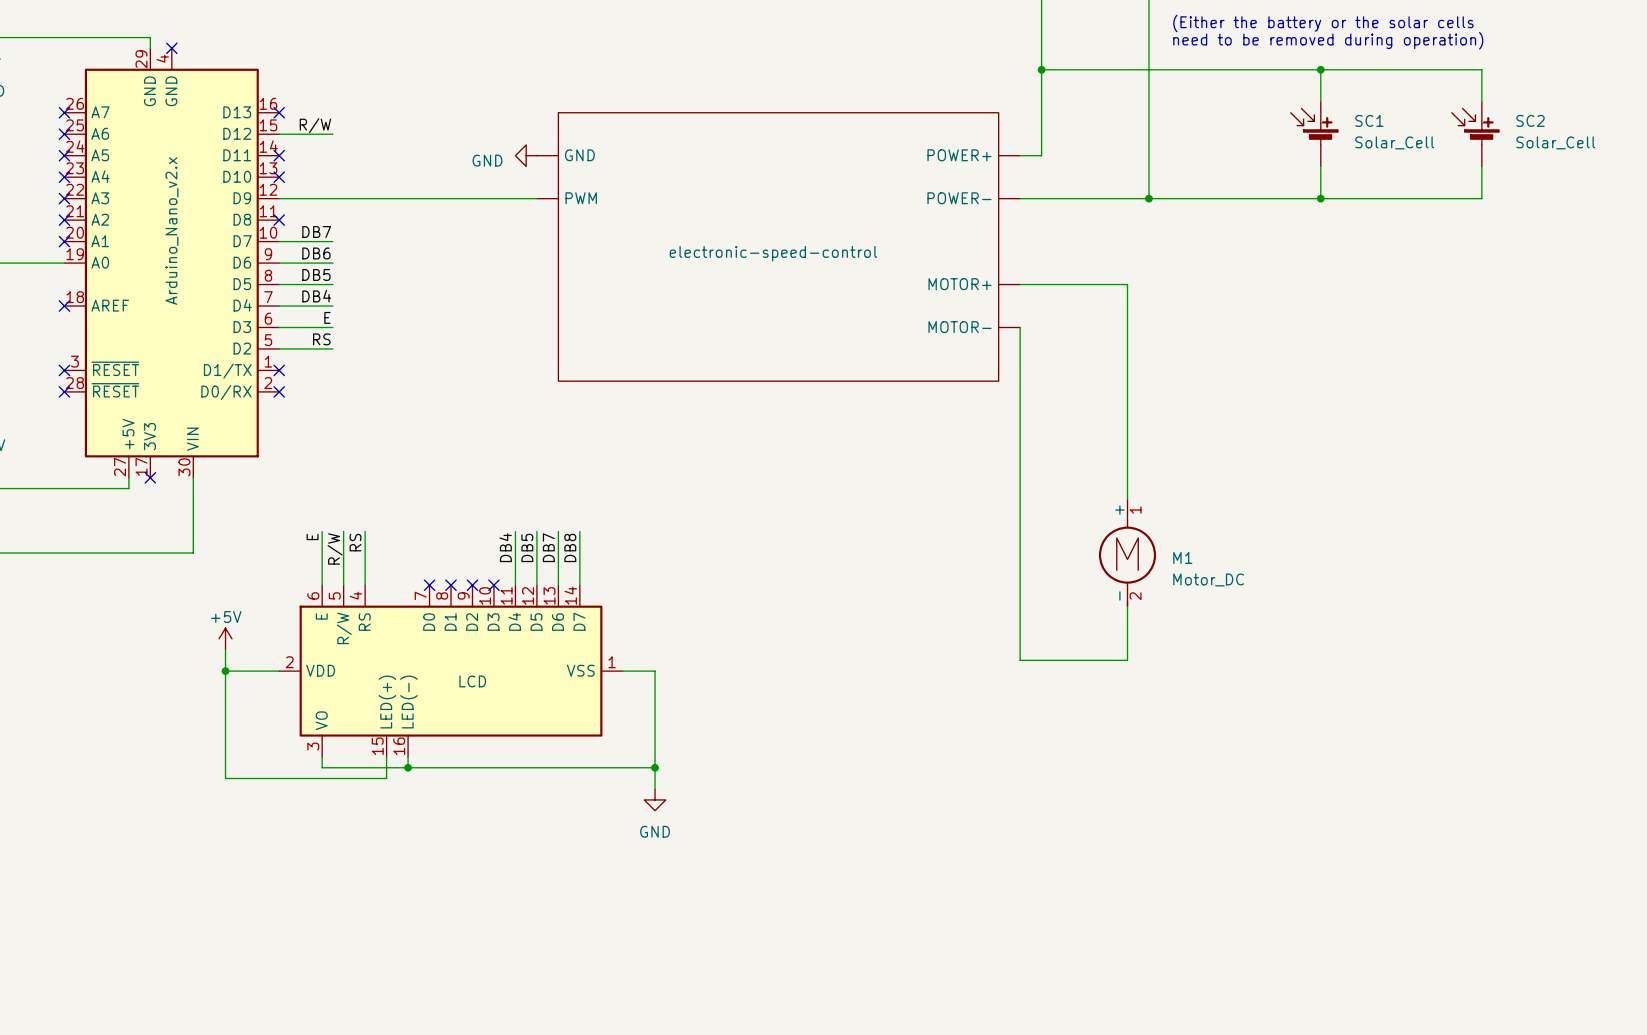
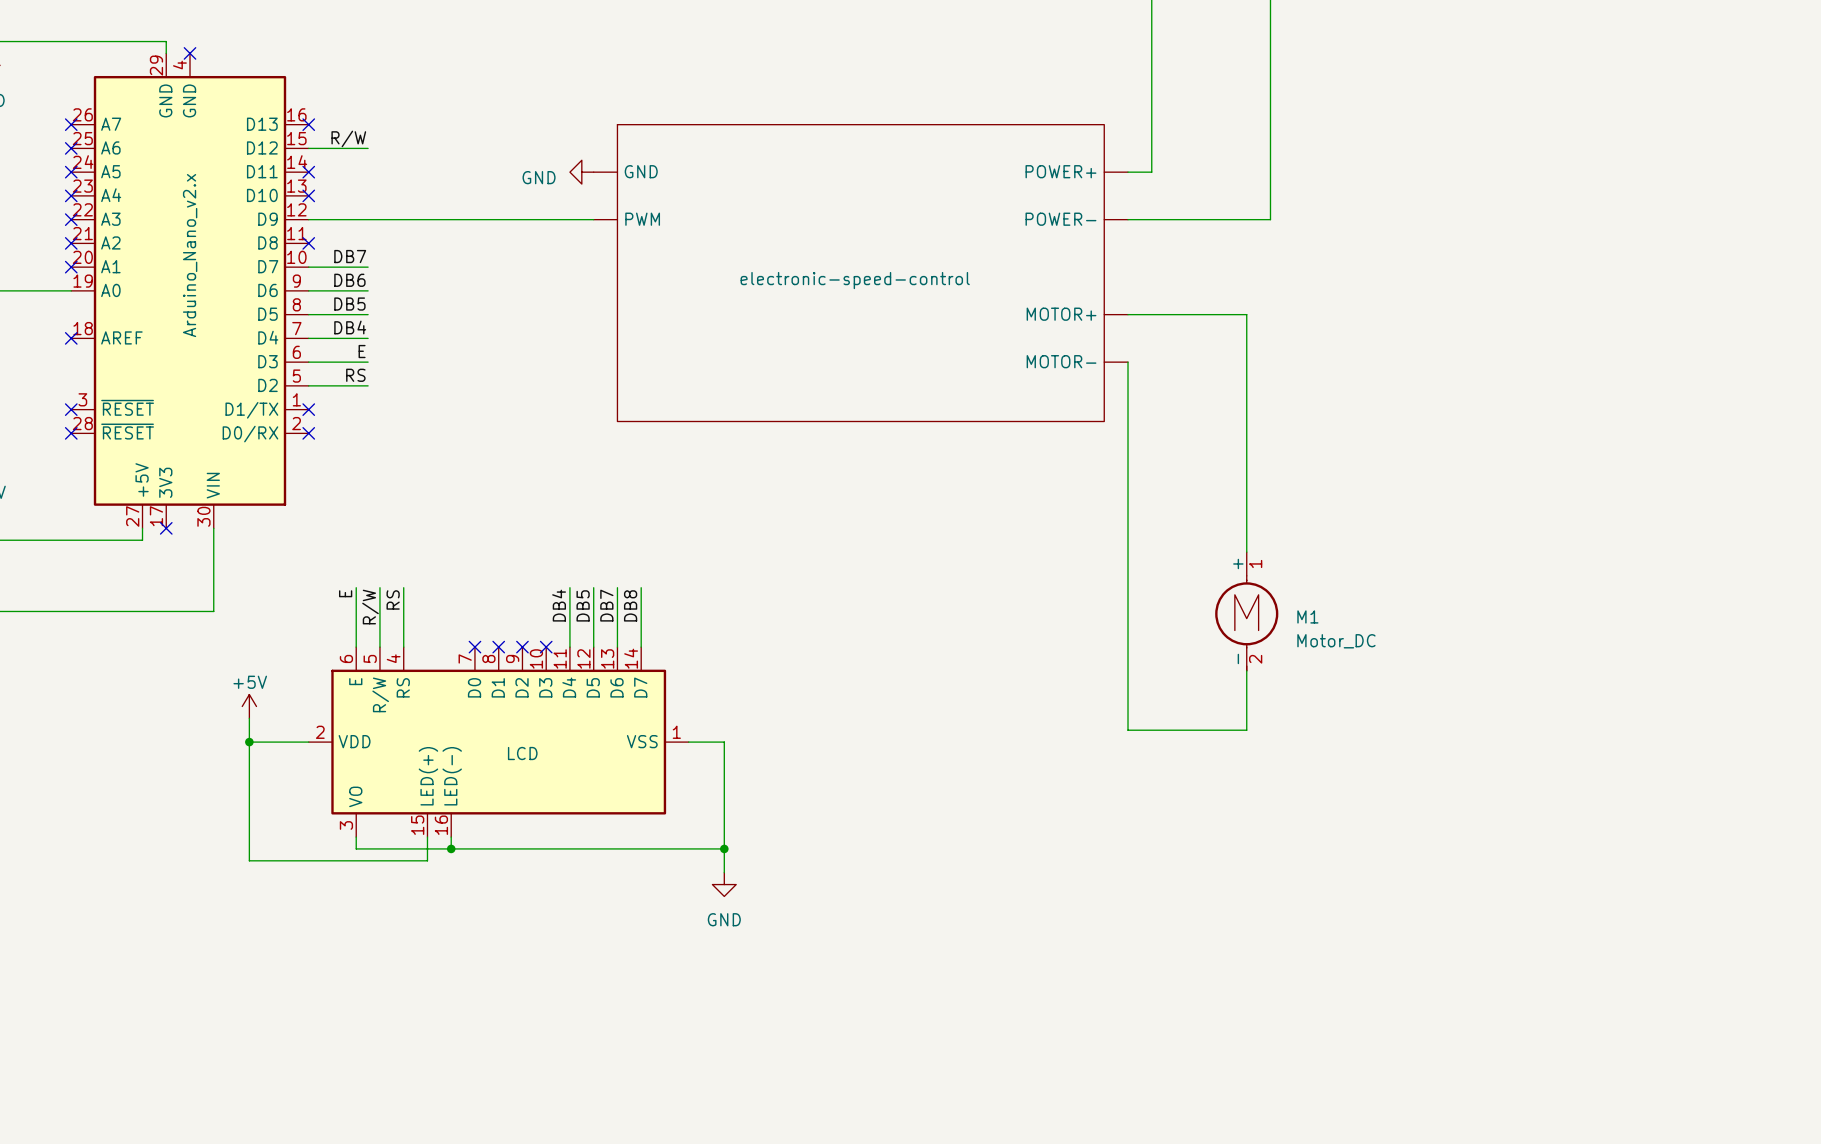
text: (Either the battery or the solar cells (1323, 23) -> none
text: need to be removed during operation) (1328, 40) -> none
wire: (1041, 69) (1481, 69) (1481, 102) -> none
junction: (1041, 69) -> none
wire: (1320, 69) (1320, 102) -> none
junction: (1320, 69) -> none
SC1: Solar_Cell (1314, 134) -> none
SC2: Solar_Cell (1475, 134) -> none
wire: (1320, 166) (1320, 198) -> none
wire: (1481, 166) (1481, 198) (1148, 198) -> none
junction: (1148, 198) -> none
junction: (1320, 198) -> none

